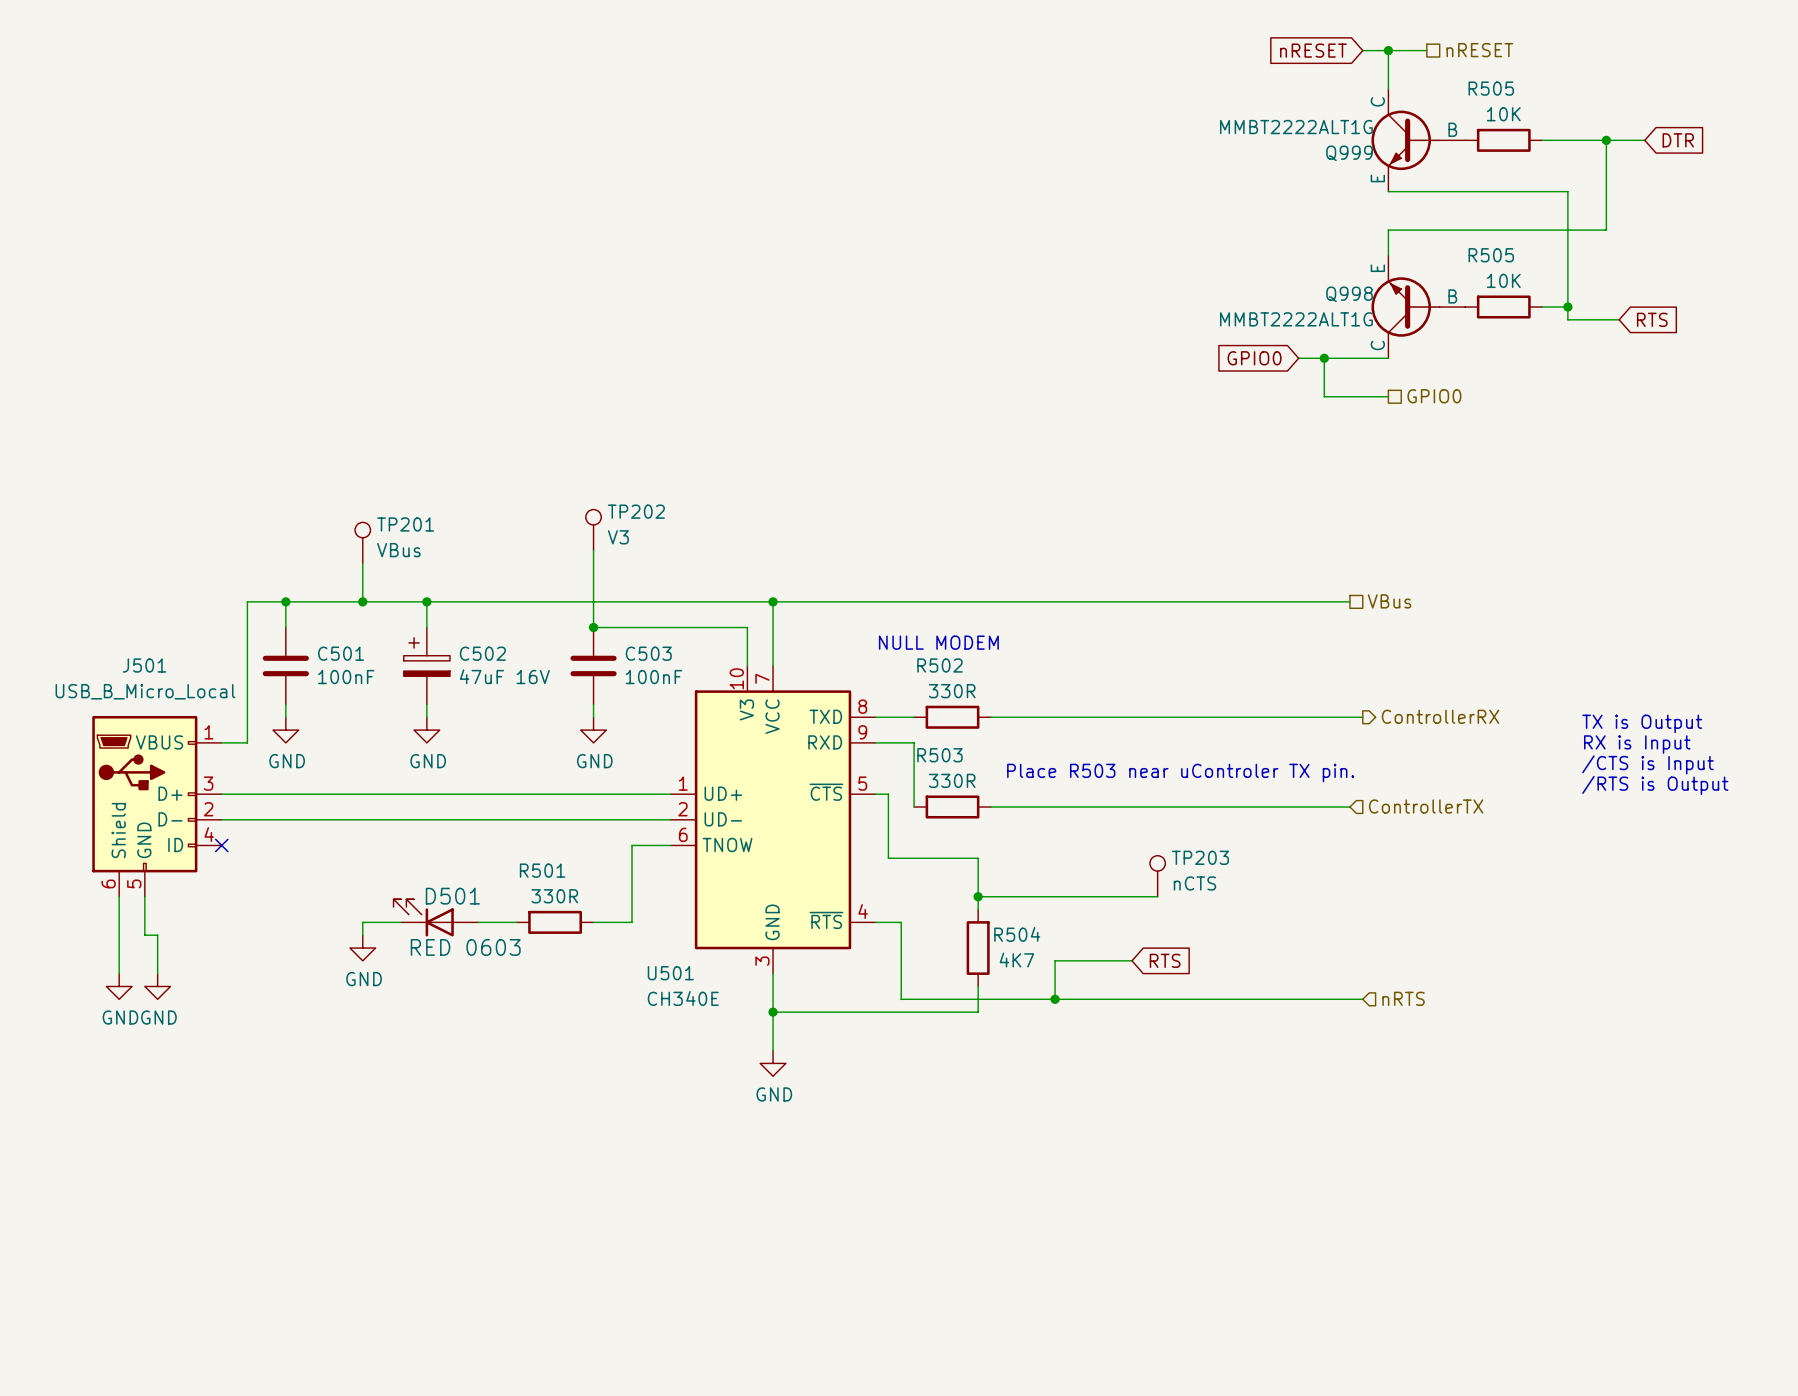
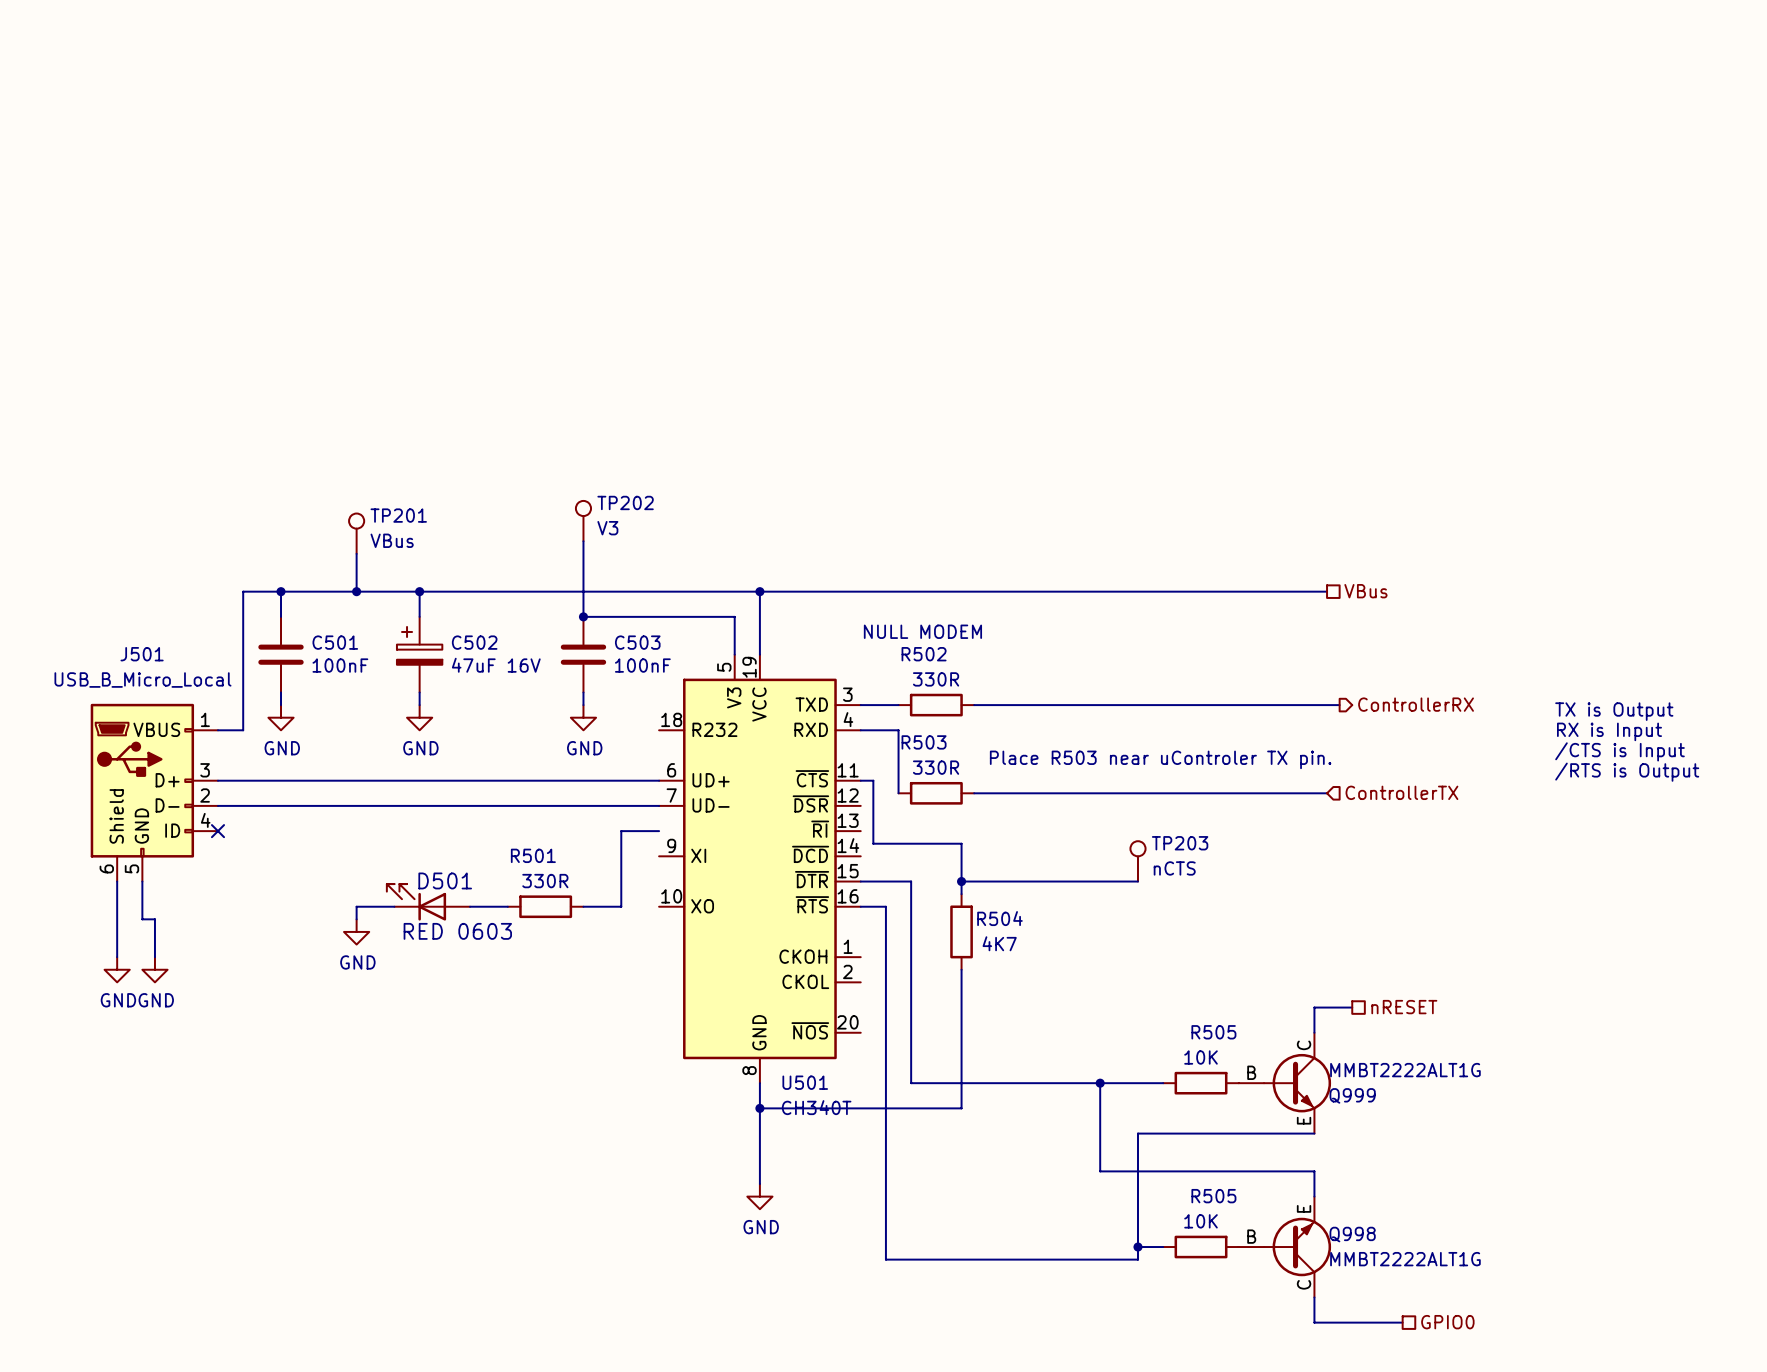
global label: nRESET (1313, 50) -> none
wire: (1362, 50) (1426, 50) -> none
wire: (1388, 50) (1388, 89) -> none
junction: (1388, 50) -> none
hierarchical label: nRESET (1479, 50) -> none
Q999 flip: as is (1405, 140) -> left-right (1297, 1083)
Q999 position: (1418, 140) -> (1284, 1083)
R505: 10K (1503, 140) -> none
wire: (1542, 140) (1644, 140) -> none
wire: (1606, 140) (1606, 230) (1388, 230) (1388, 255) -> none
junction: (1606, 140) -> none
global label: DTR (1678, 140) -> none
wire: (1388, 191) (1567, 191) (1567, 319) (1619, 319) -> none
Q998 flip: as is (1405, 307) -> left-right (1297, 1247)
Q998 position: (1418, 307) -> (1284, 1247)
R505: 10K (1503, 307) -> none
wire: (1542, 307) (1567, 307) -> none
junction: (1567, 307) -> none
global label: RTS (1652, 319) -> none
global label: GPIO0 (1254, 358) -> none
wire: (1298, 358) (1388, 358) -> none
wire: (1324, 358) (1324, 396) (1388, 396) -> none
junction: (1324, 358) -> none
hierarchical label: GPIO0 (1434, 396) -> none
U501 symbol: [670, 665, 876, 974] -> [659, 654, 861, 1084]
wire: none -> (860, 881) (911, 881) (911, 1083) (1163, 1083)
wire: (1132, 960) (1055, 960) (1055, 999) -> none
global label: RTS (1165, 960) -> none
U501 name position: U501 (670, 973) -> U501 (805, 1082)
U501 value: CH340E (683, 998) -> CH340T (816, 1107)
hierarchical label: nRTS (1403, 998) -> none
wire: (901, 999) (1362, 999) -> (885, 982) (885, 1259) (1138, 1259) (1138, 1133) (1314, 1133)
junction: (1055, 999) -> none
wire: (773, 1012) (978, 1012) -> (759, 1108) (961, 1108) (961, 994)
junction: (773, 1012) -> none
wire: none -> (1352, 1007) (1314, 1007) (1314, 1032)
hierarchical label: none -> nRESET (1404, 1007)
power symbol position: GND (773, 1063) -> GND (759, 1196)
wire: none -> (759, 1083) (759, 1184)
wire: none -> (1100, 1083) (1100, 1171) (1314, 1171) (1314, 1196)
junction: none -> (1100, 1083)
R505: none -> 10K (1201, 1083)
junction: none -> (759, 1108)
wire: none -> (1138, 1247) (1163, 1247)
junction: none -> (1138, 1247)
R505: none -> 10K (1201, 1247)
wire: none -> (1314, 1297) (1314, 1322) (1402, 1322)
hierarchical label: none -> GPIO0 (1447, 1322)

